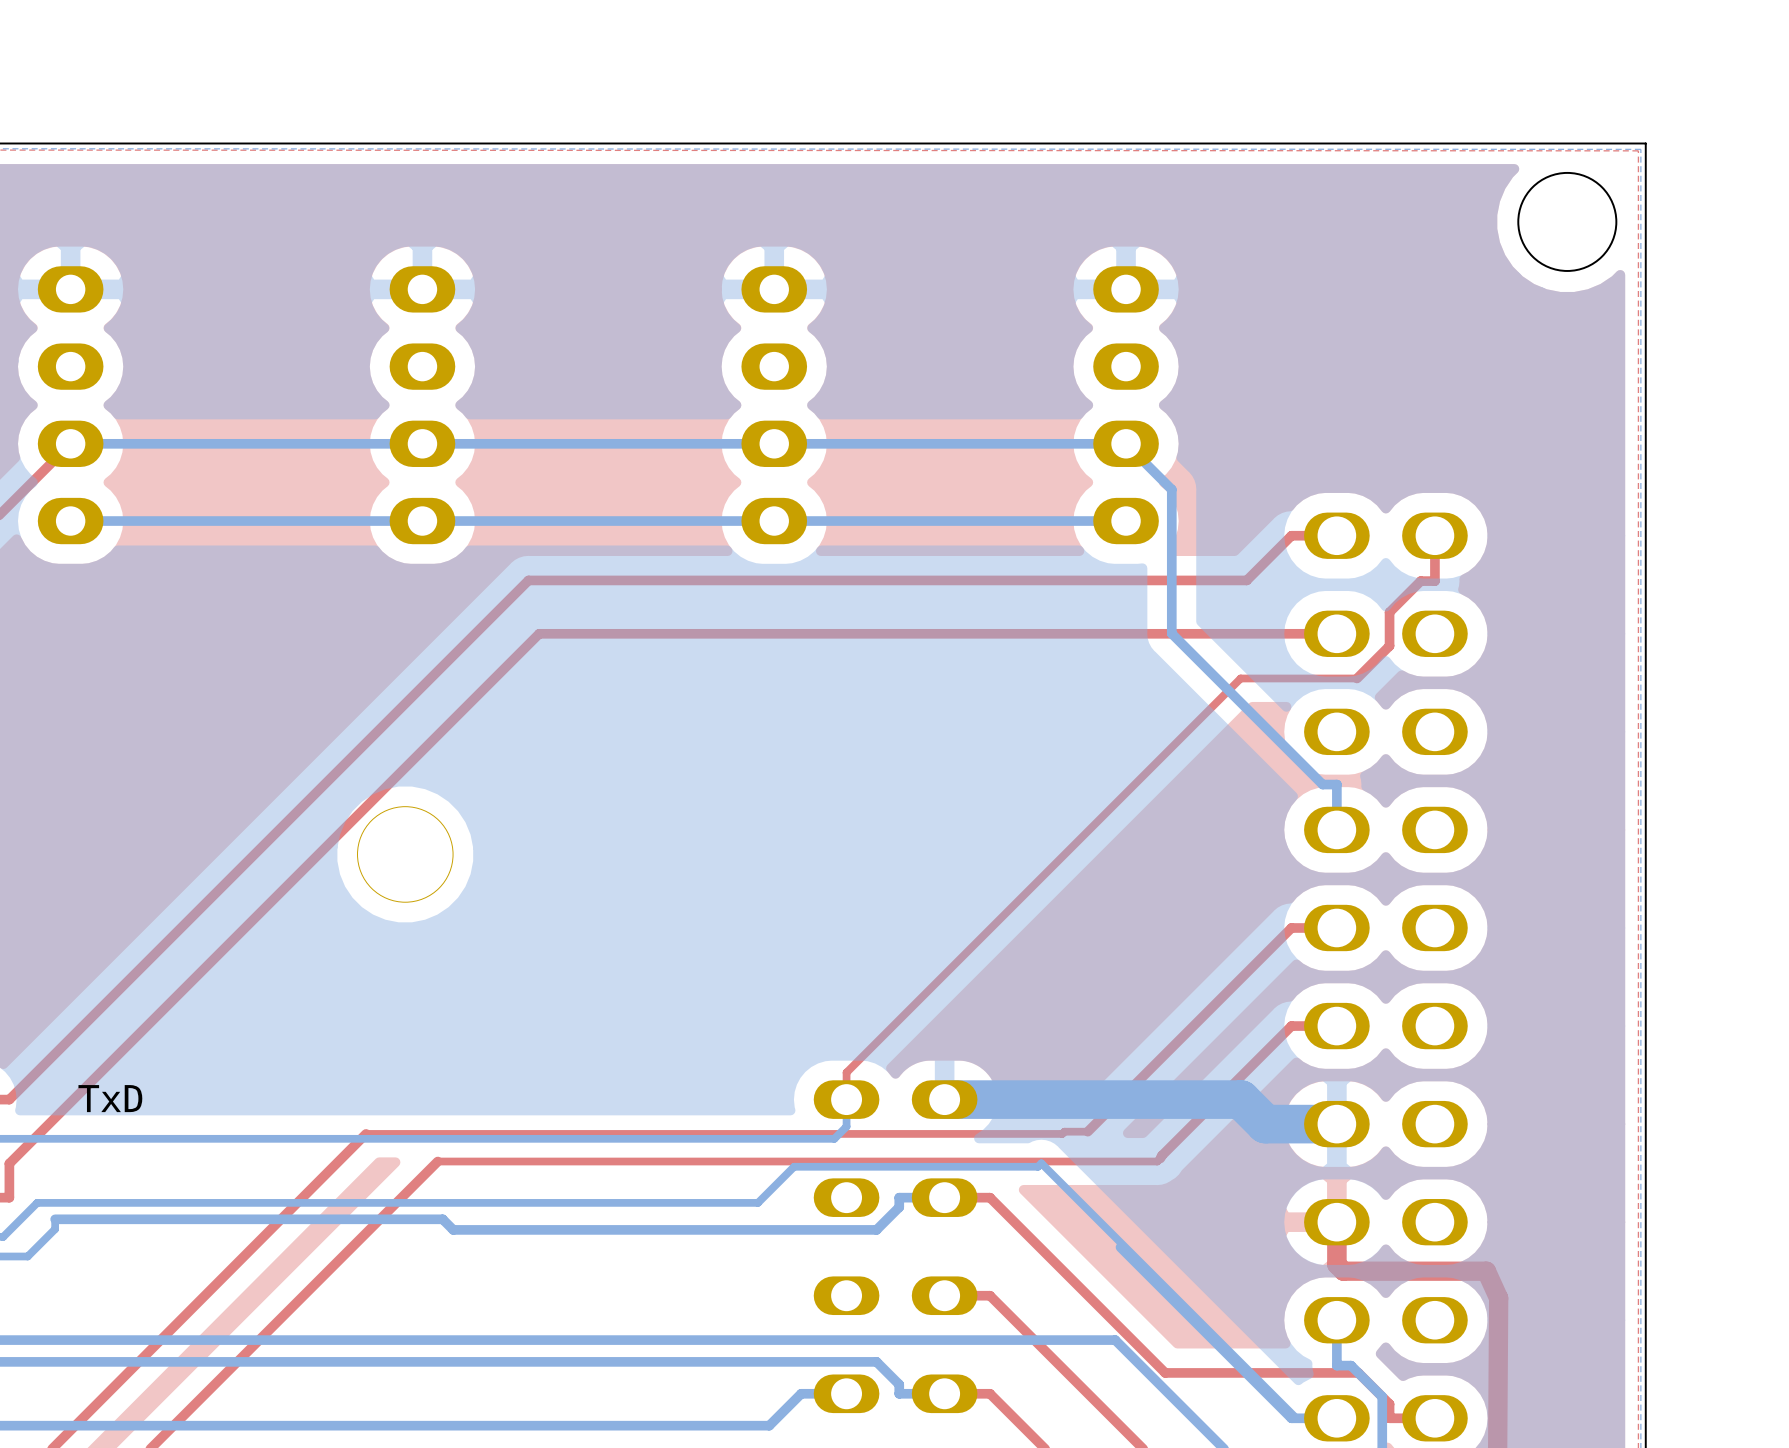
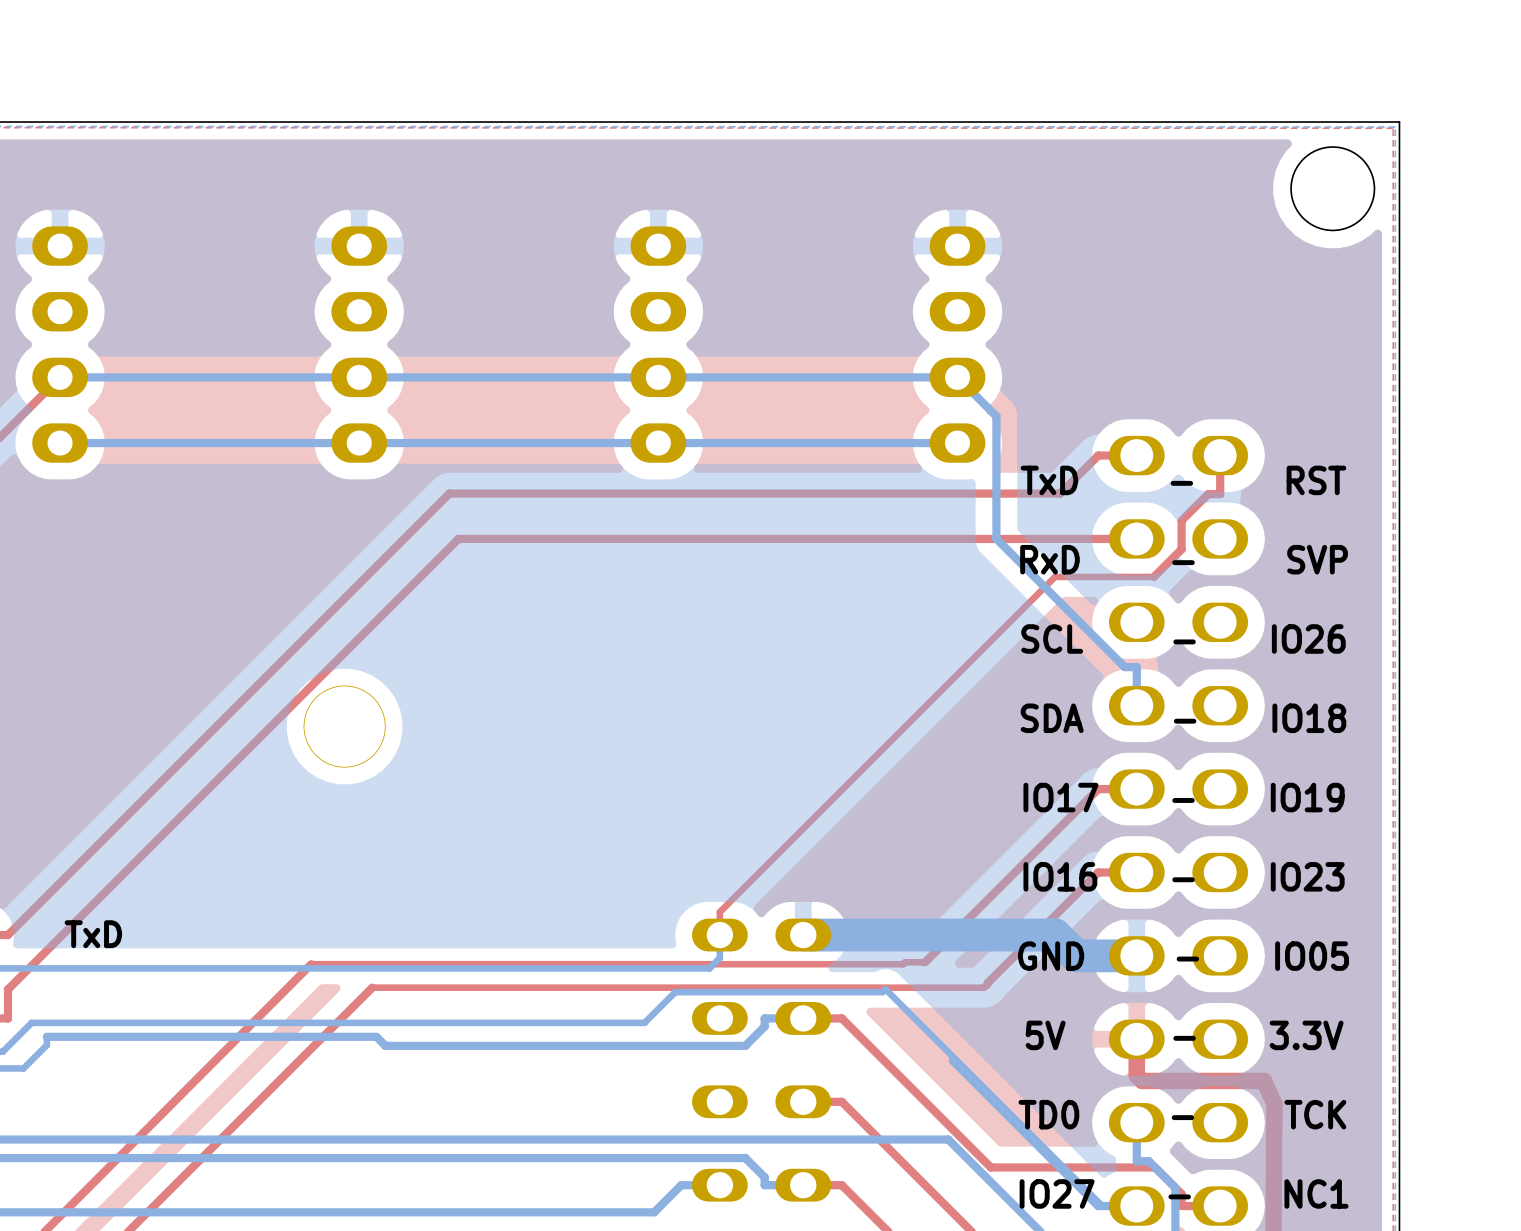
text: none -> TxD - RST (1183, 480)
text: none -> RxD - SVP (1184, 559)
text: none -> SCL - IO26 (1183, 638)
text: none -> SDA - IO18 (1183, 718)
text: none -> IO17 - IO19 (1184, 797)
text: none -> IO16 - IO23 (1184, 876)
text: none -> GND - IO05 (1183, 956)
text: none -> 5V - 3.3V (1184, 1035)
text: none -> TD0 - TCK (1182, 1114)
text: none -> IO27 - NC1 (1184, 1193)

